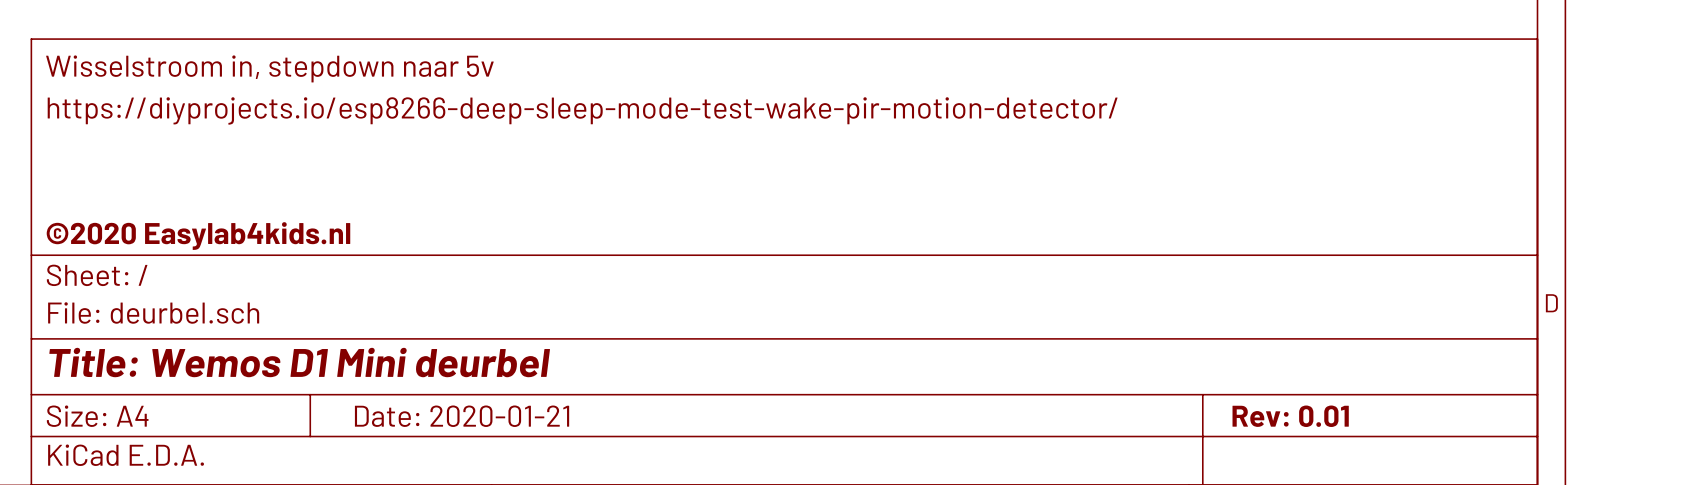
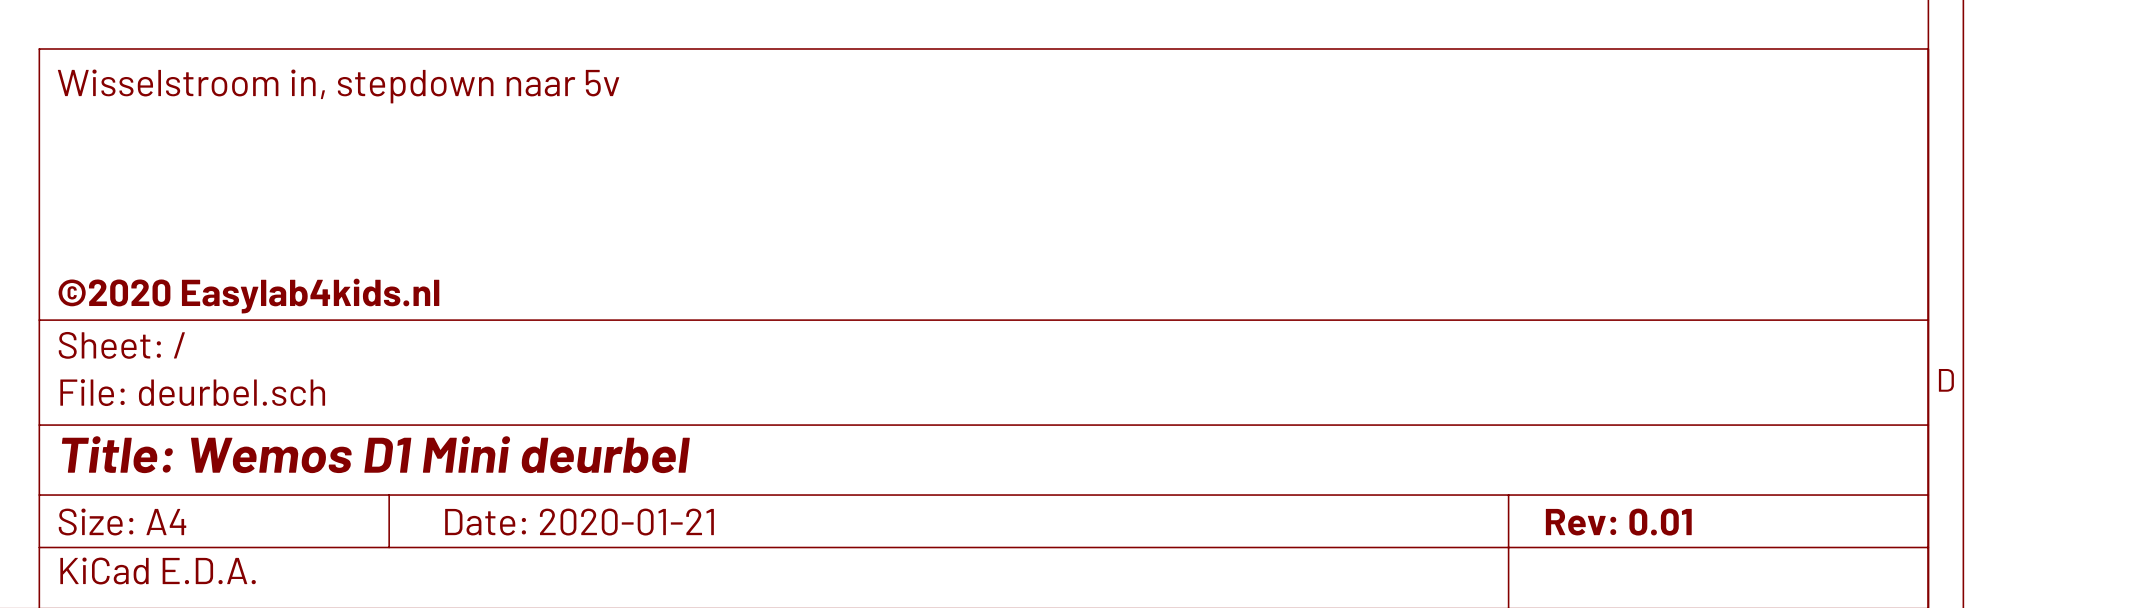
title block: https://diyprojects.io/esp8266-deep-sleep-mode-test-wake-pir-motion-detector/ (582, 110) -> none

